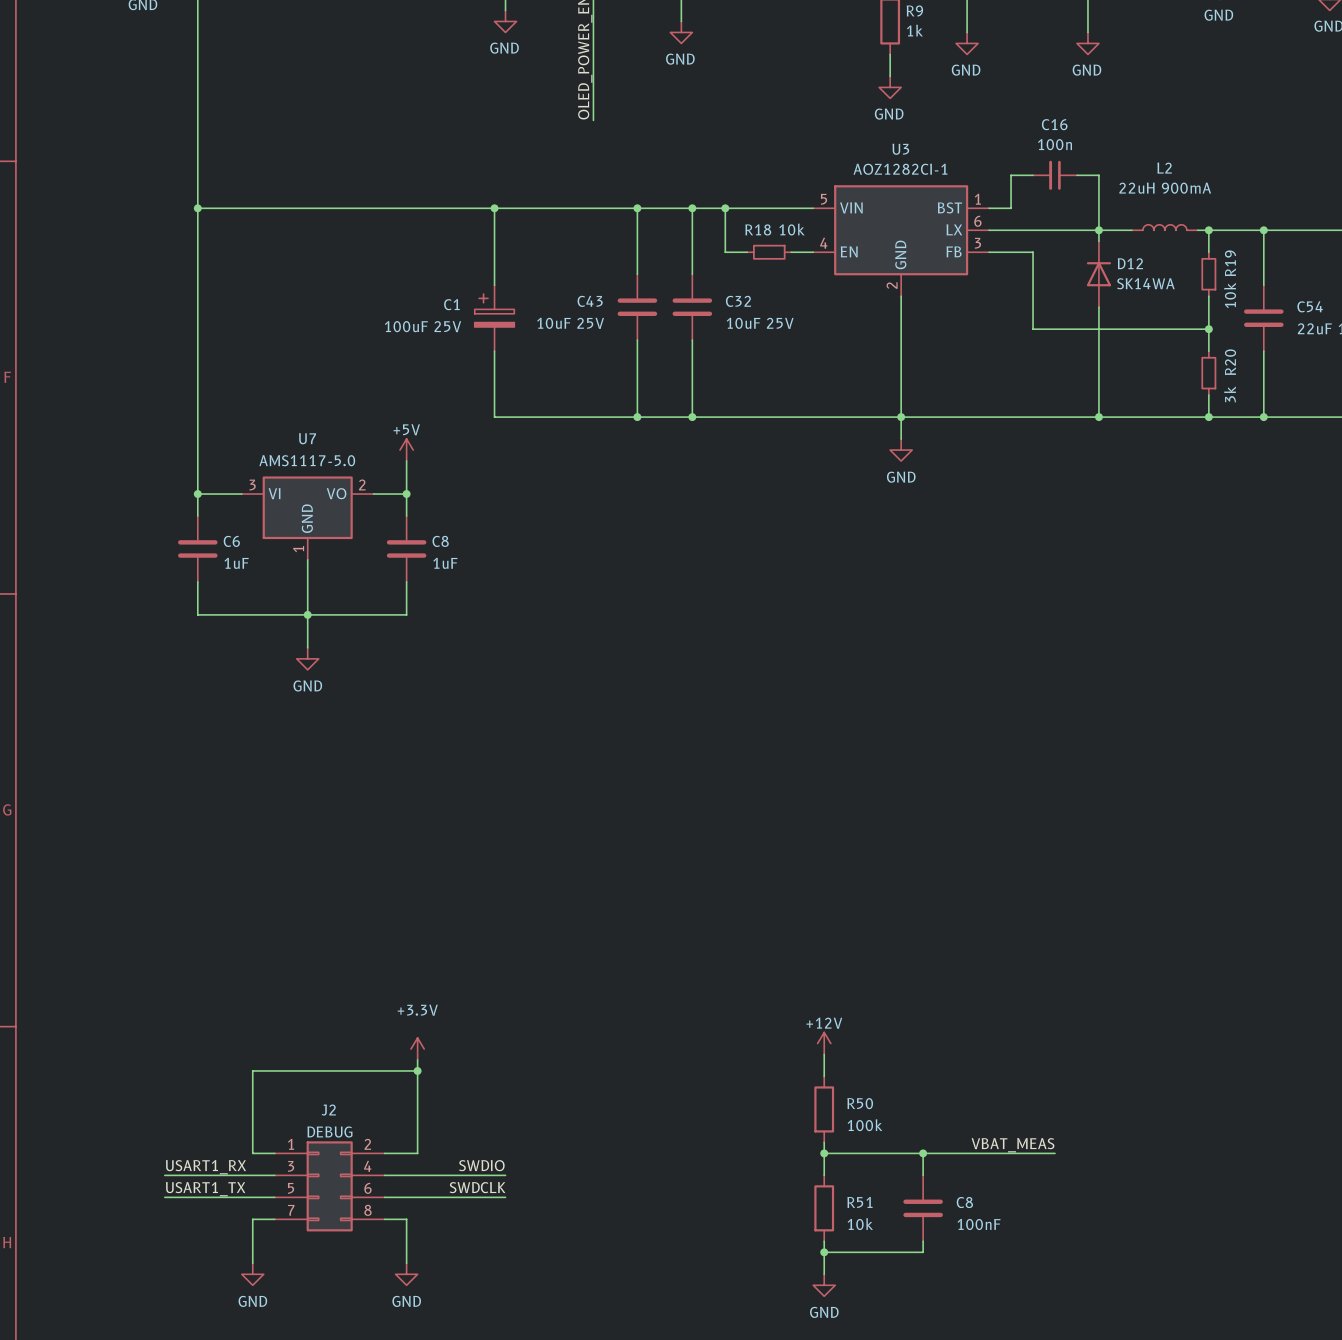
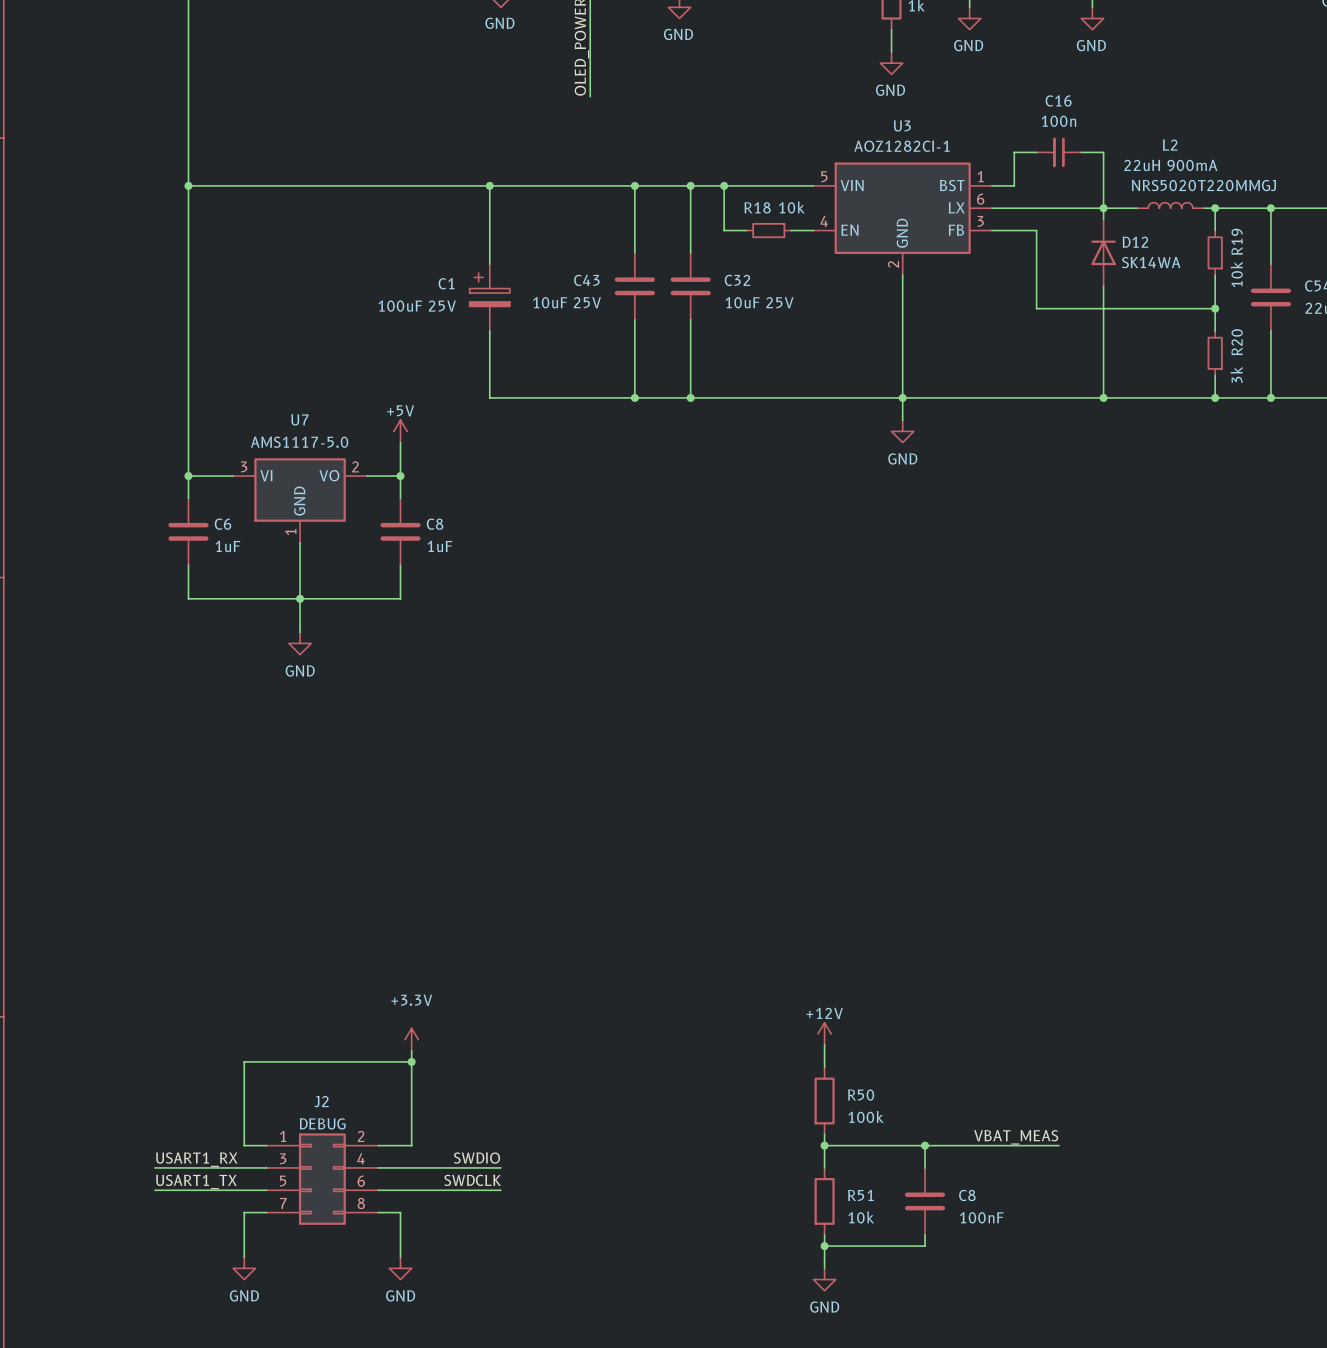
L2 text: none -> NRS5020T220MMGJ (1203, 185)

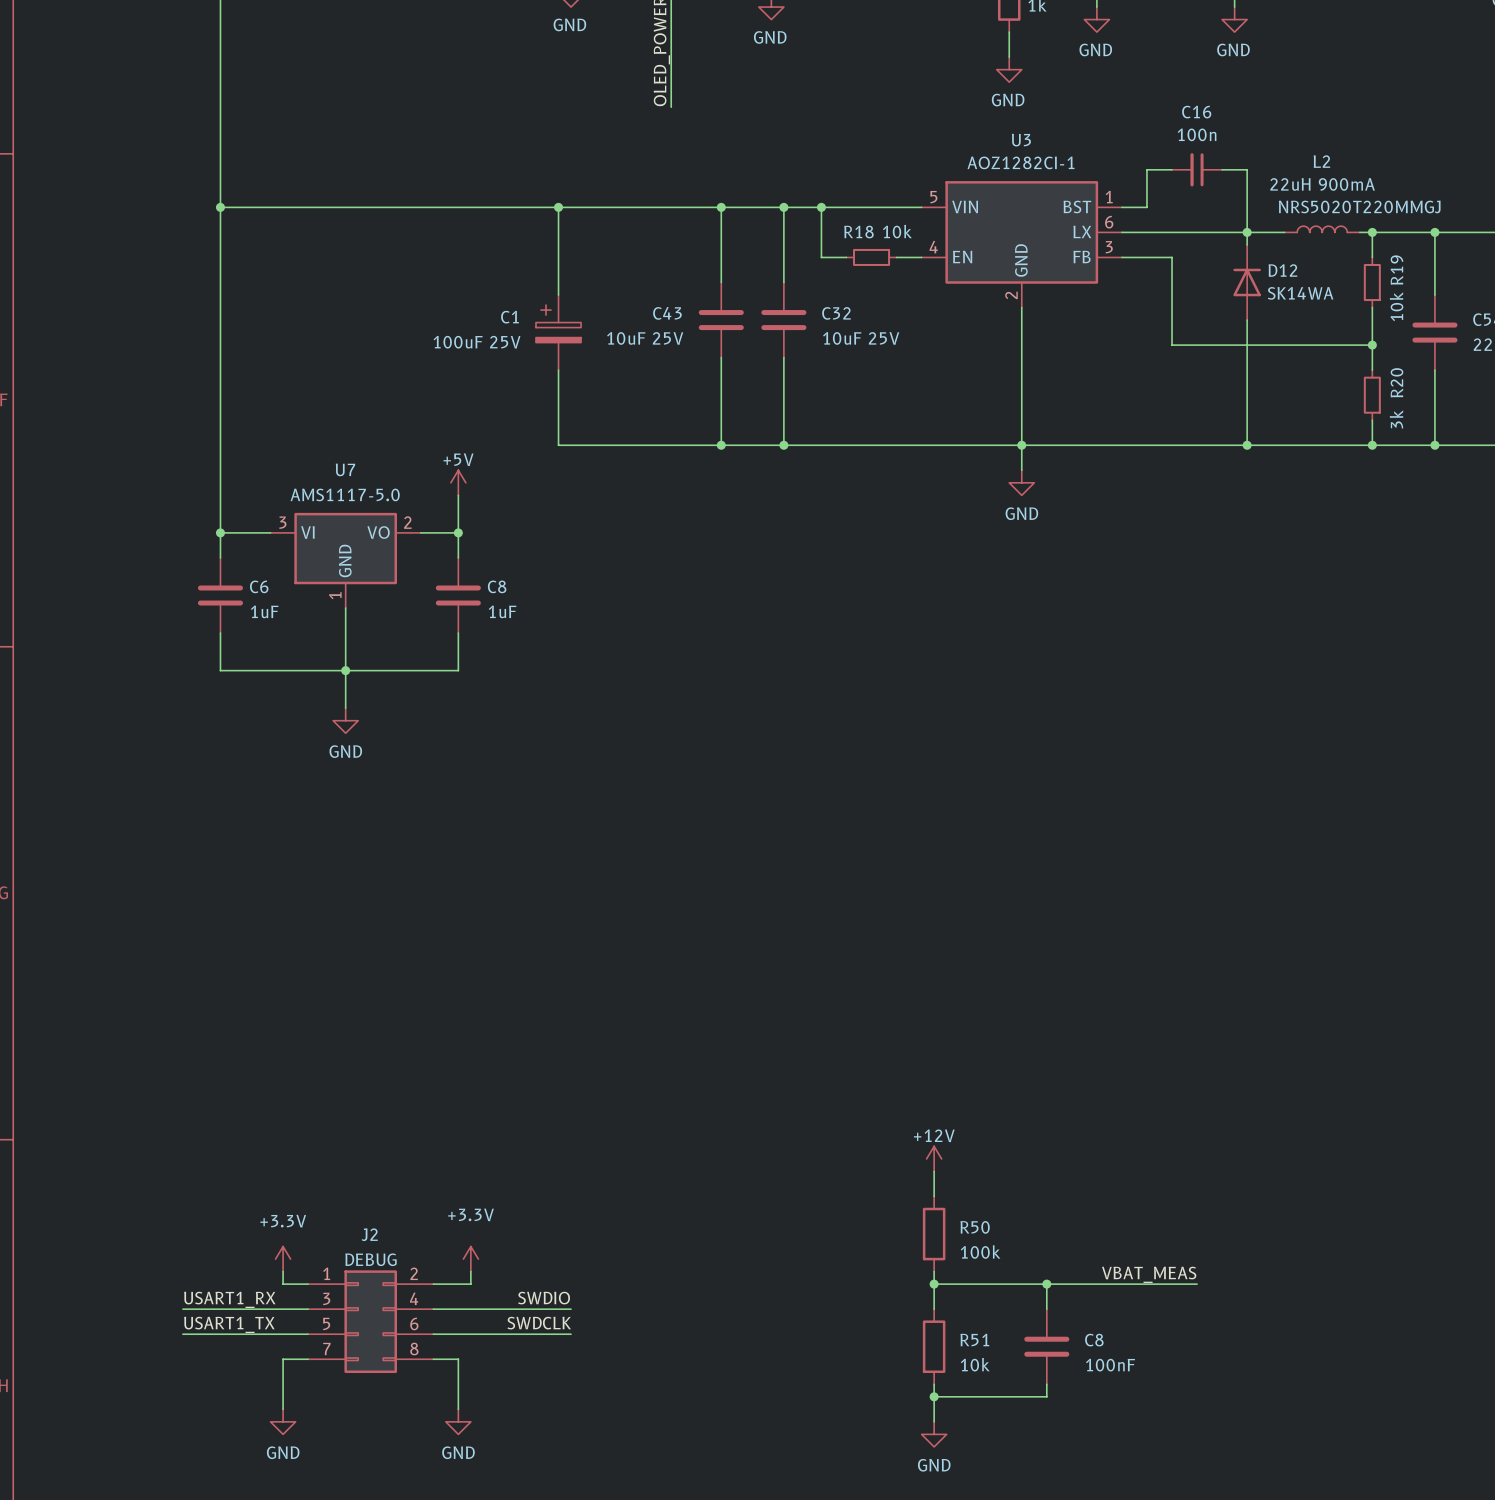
power symbol position: +3.3V (411, 1039) -> +3.3V (470, 1259)
wire: (411, 1050) (411, 1134) -> none
wire: (411, 1061) (244, 1061) (244, 1134) -> none
junction: (411, 1061) -> none
power symbol: none -> +3.3V (283, 1259)

